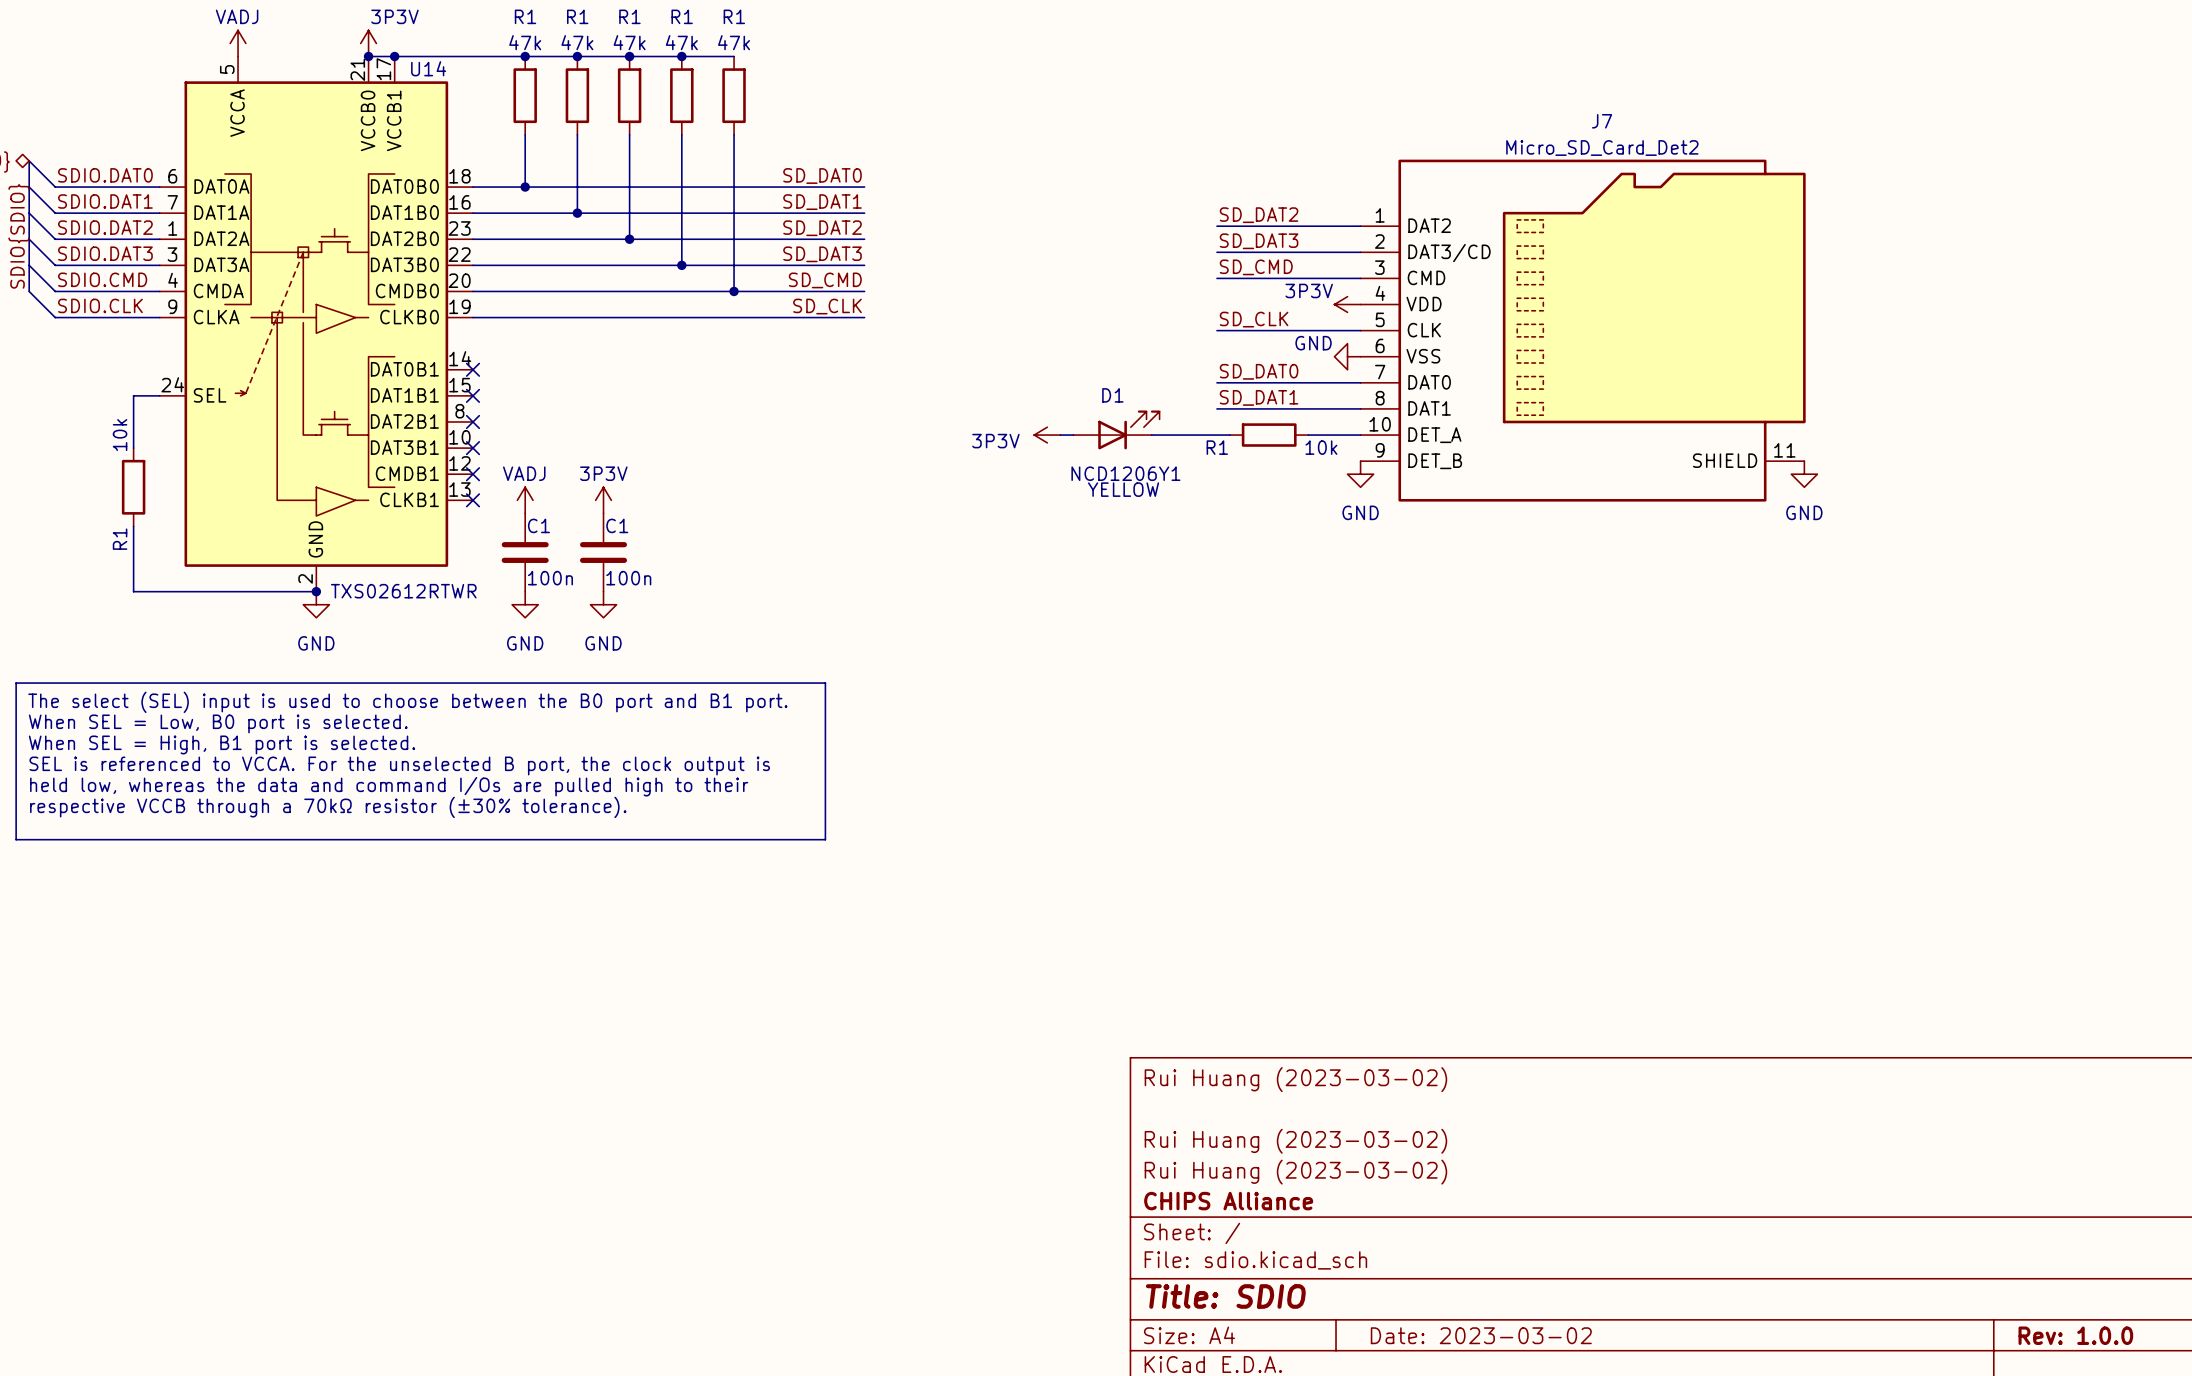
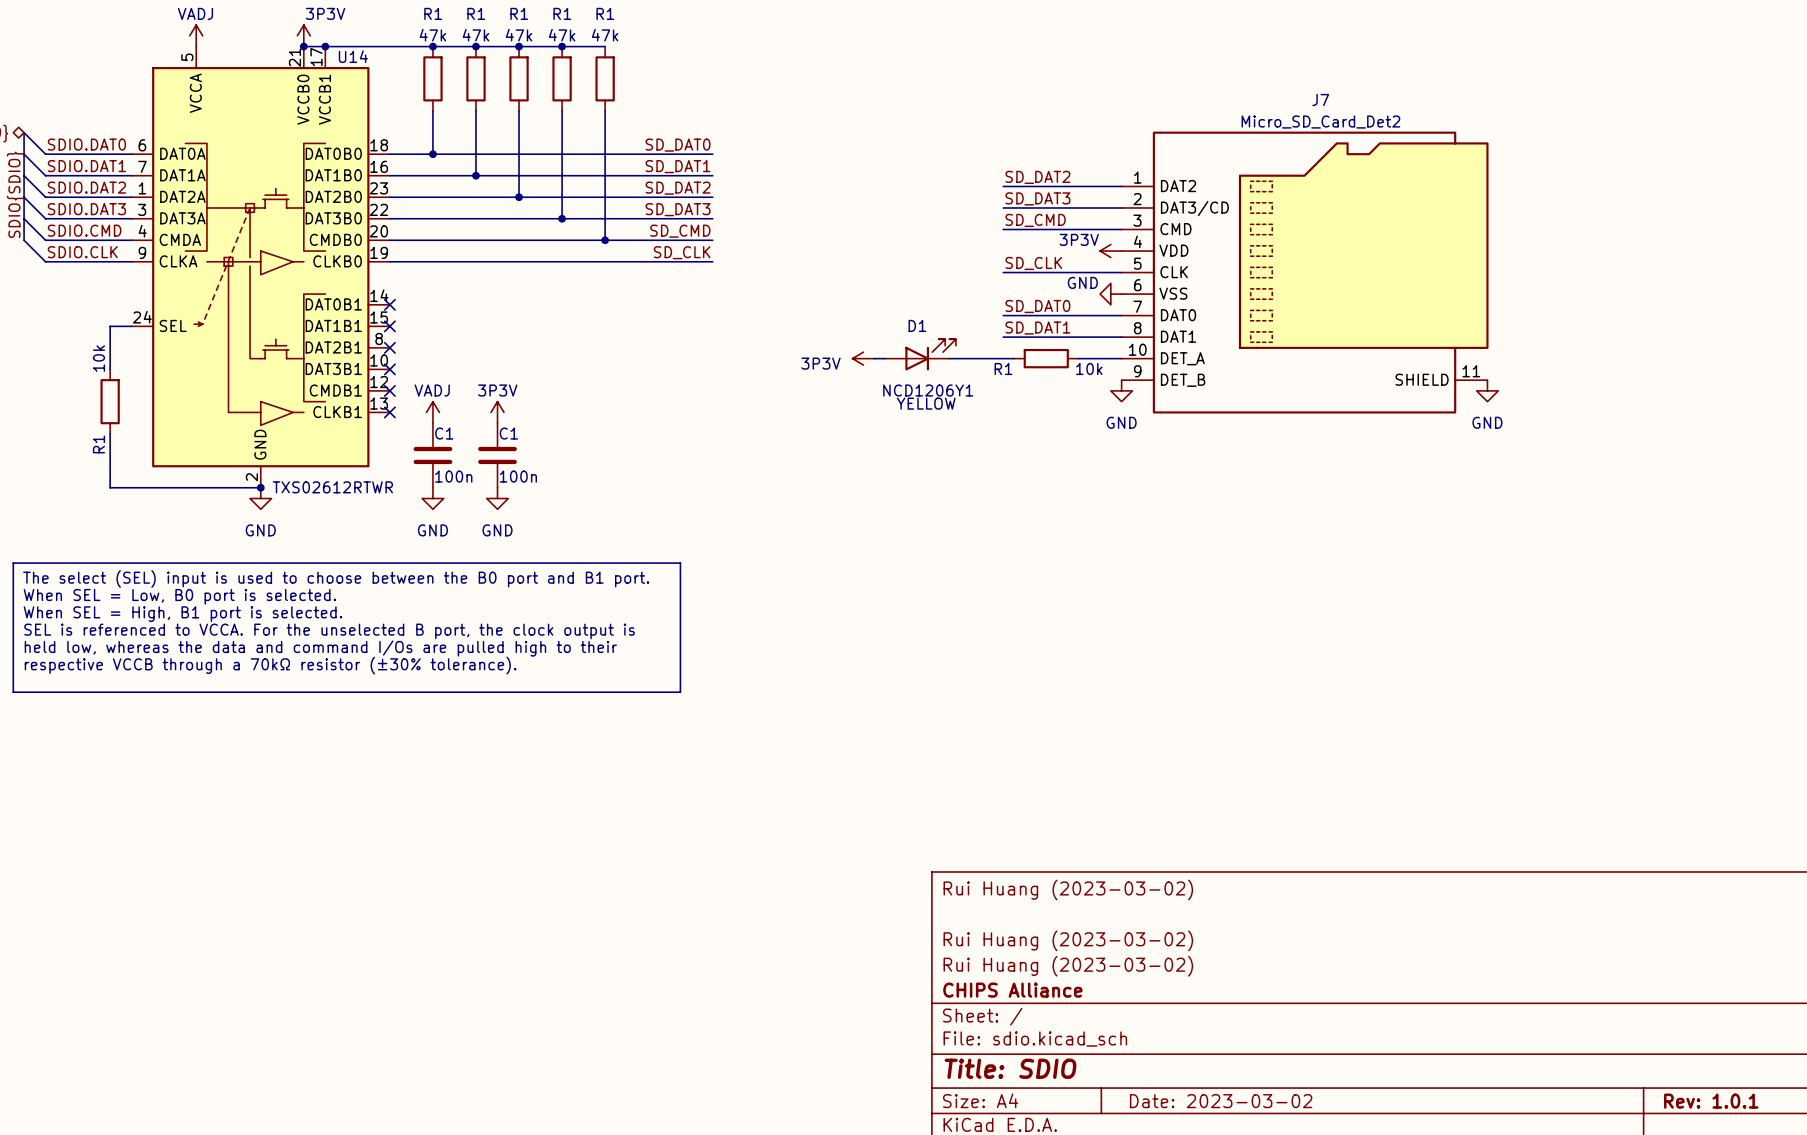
title block: Rev: 1.0.0 (2075, 1335) -> Rev: 1.0.1 (1711, 1101)

